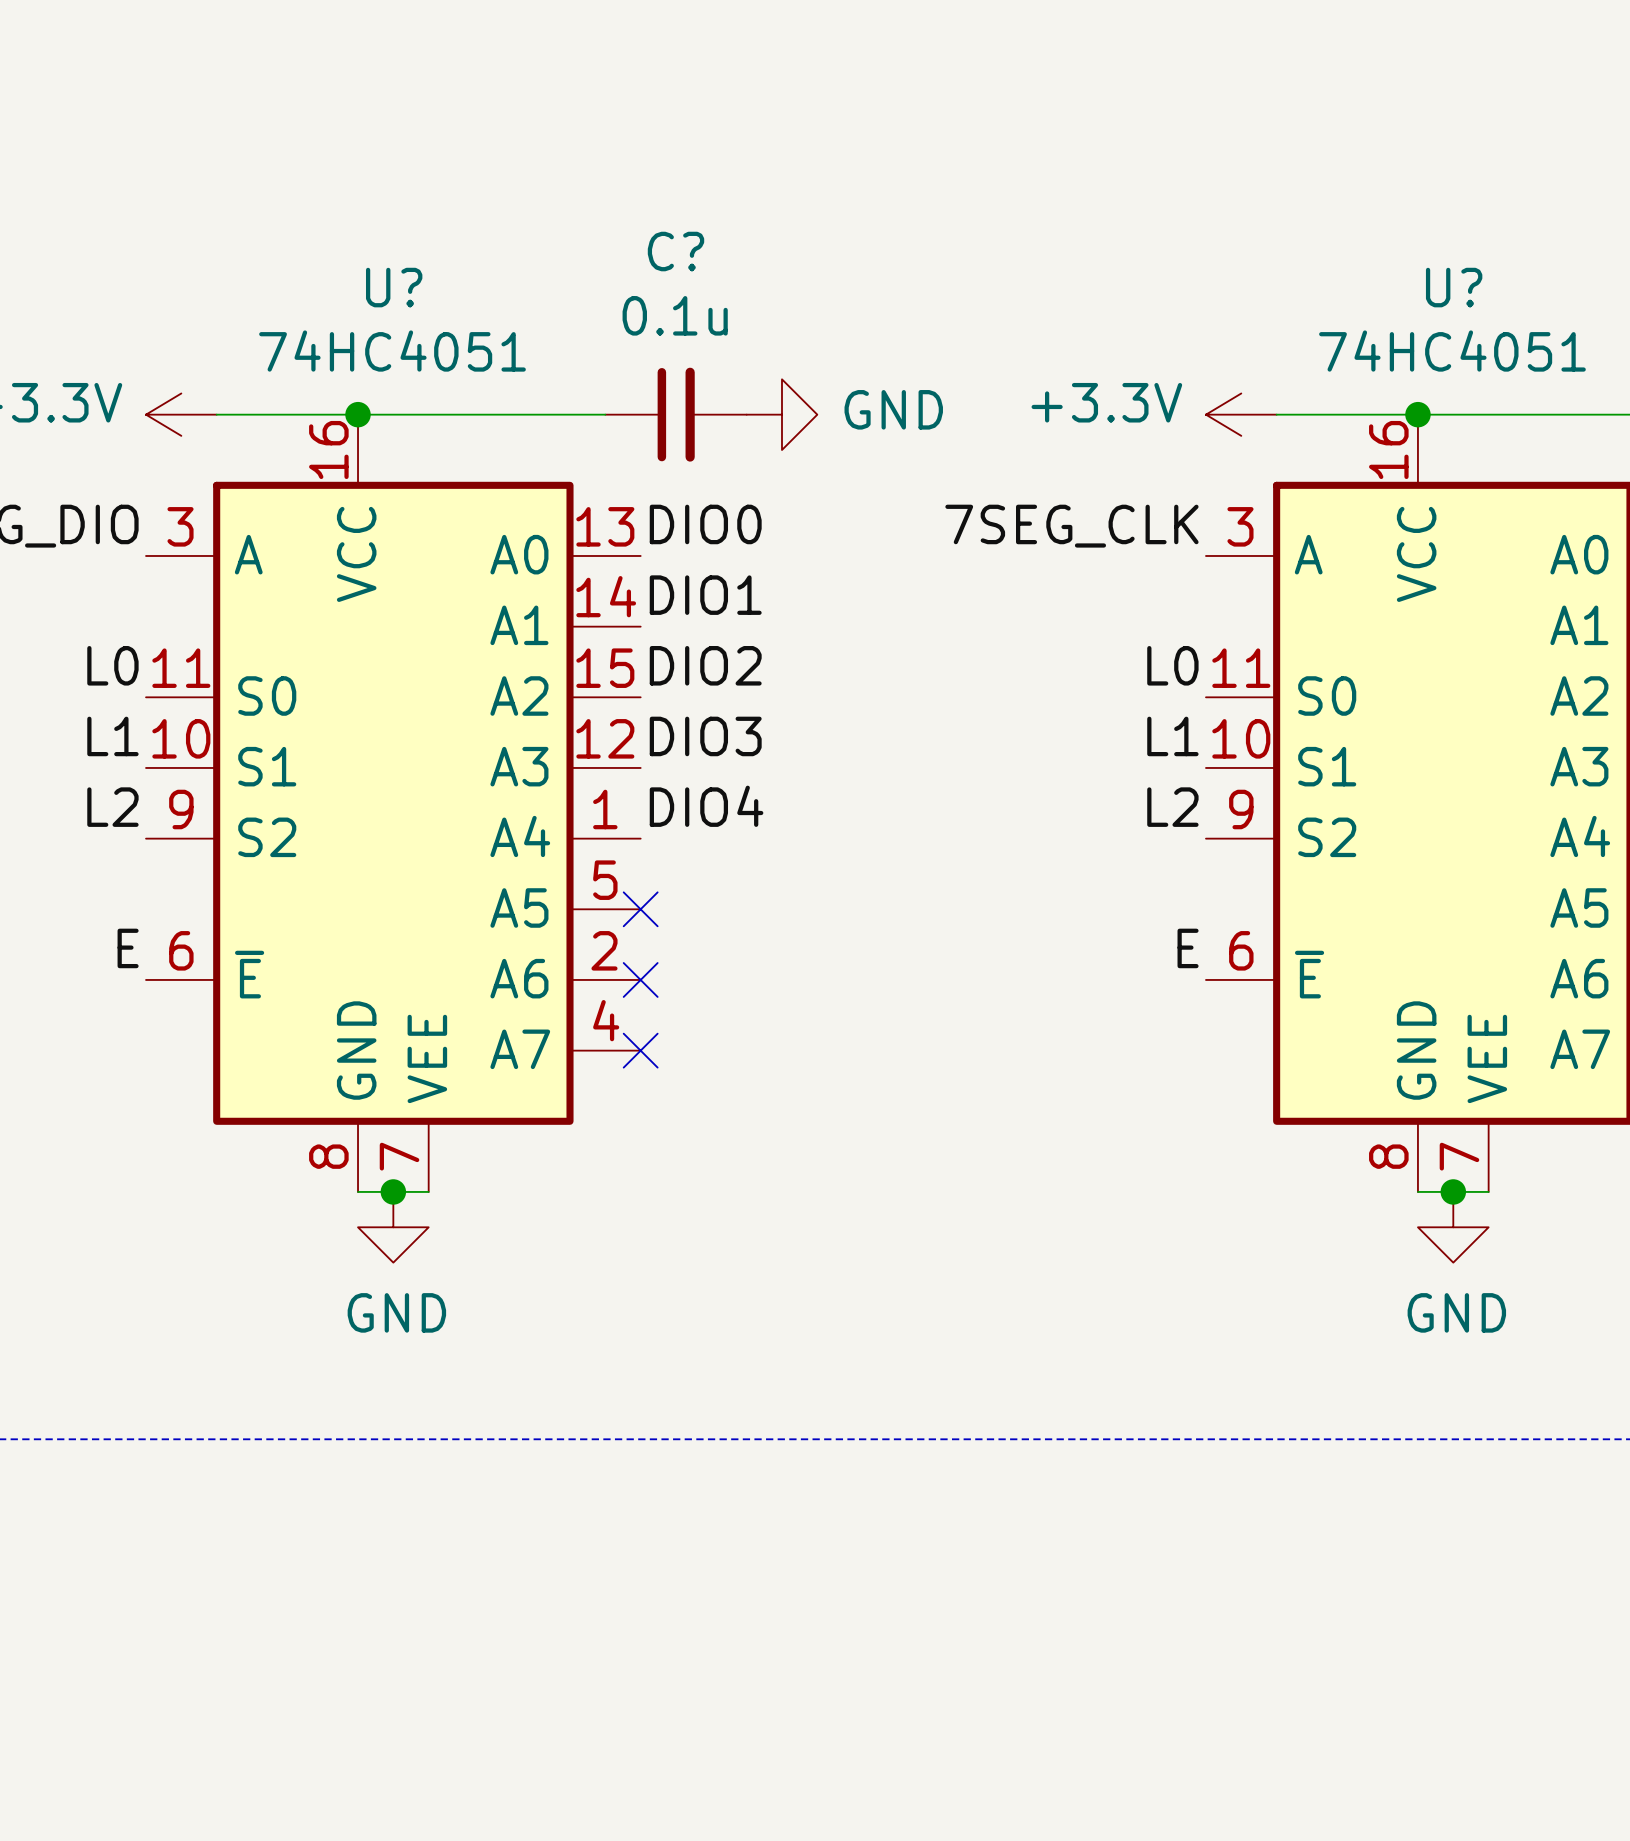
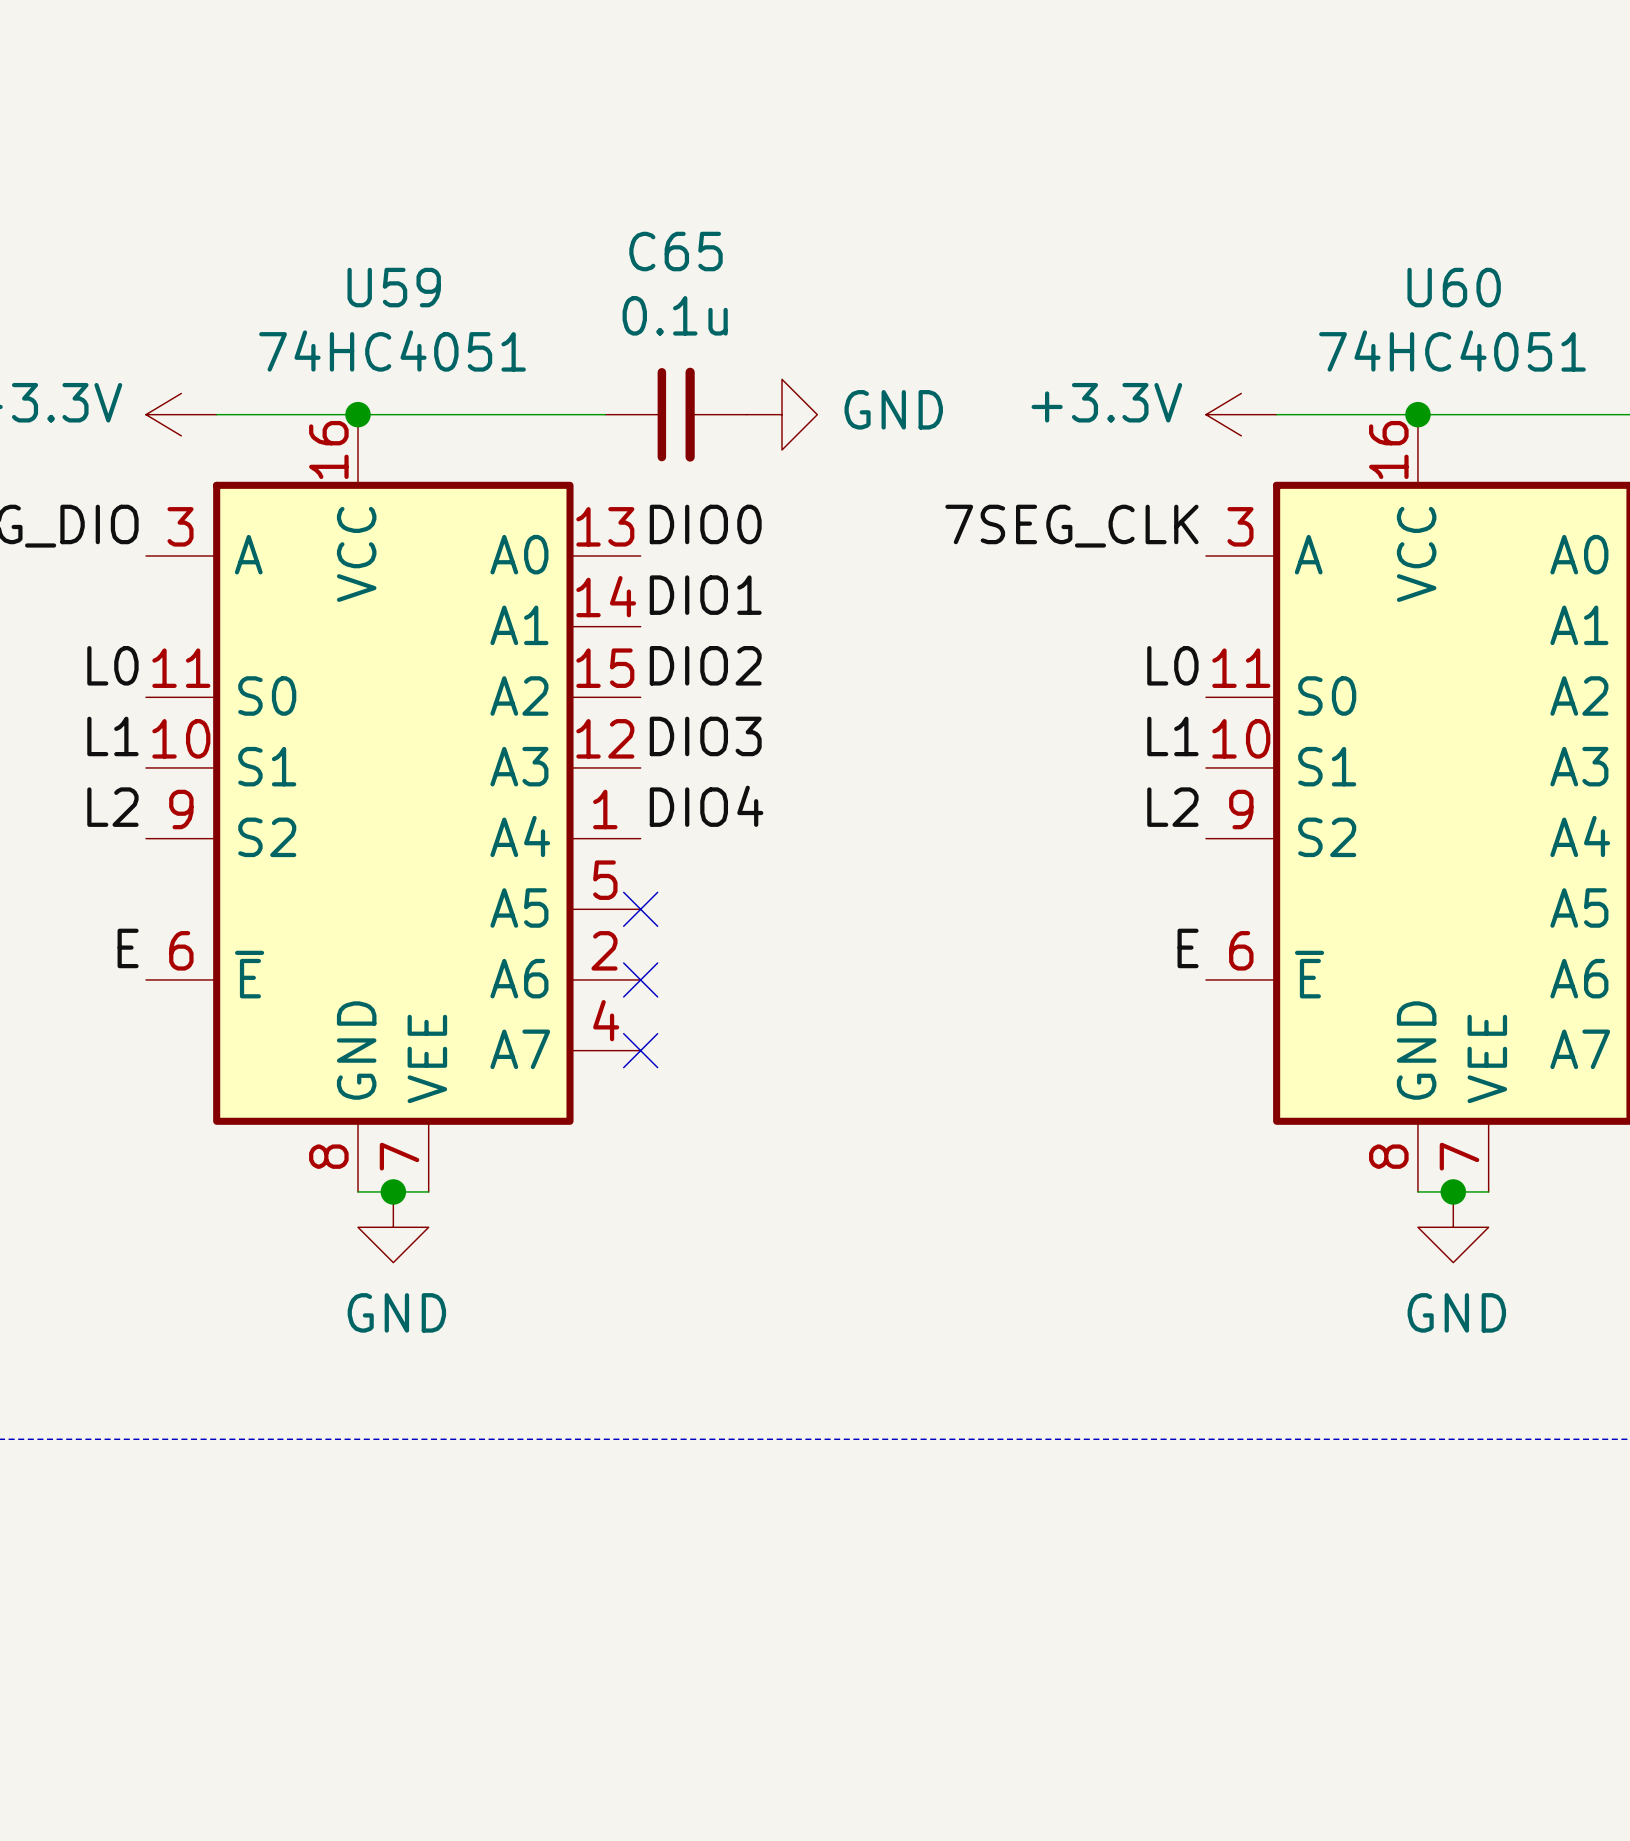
C? name: C? (676, 251) -> C65 (676, 251)
U? name: U? (394, 287) -> U59 (394, 287)
U? name: U? (1454, 287) -> U60 (1454, 287)

